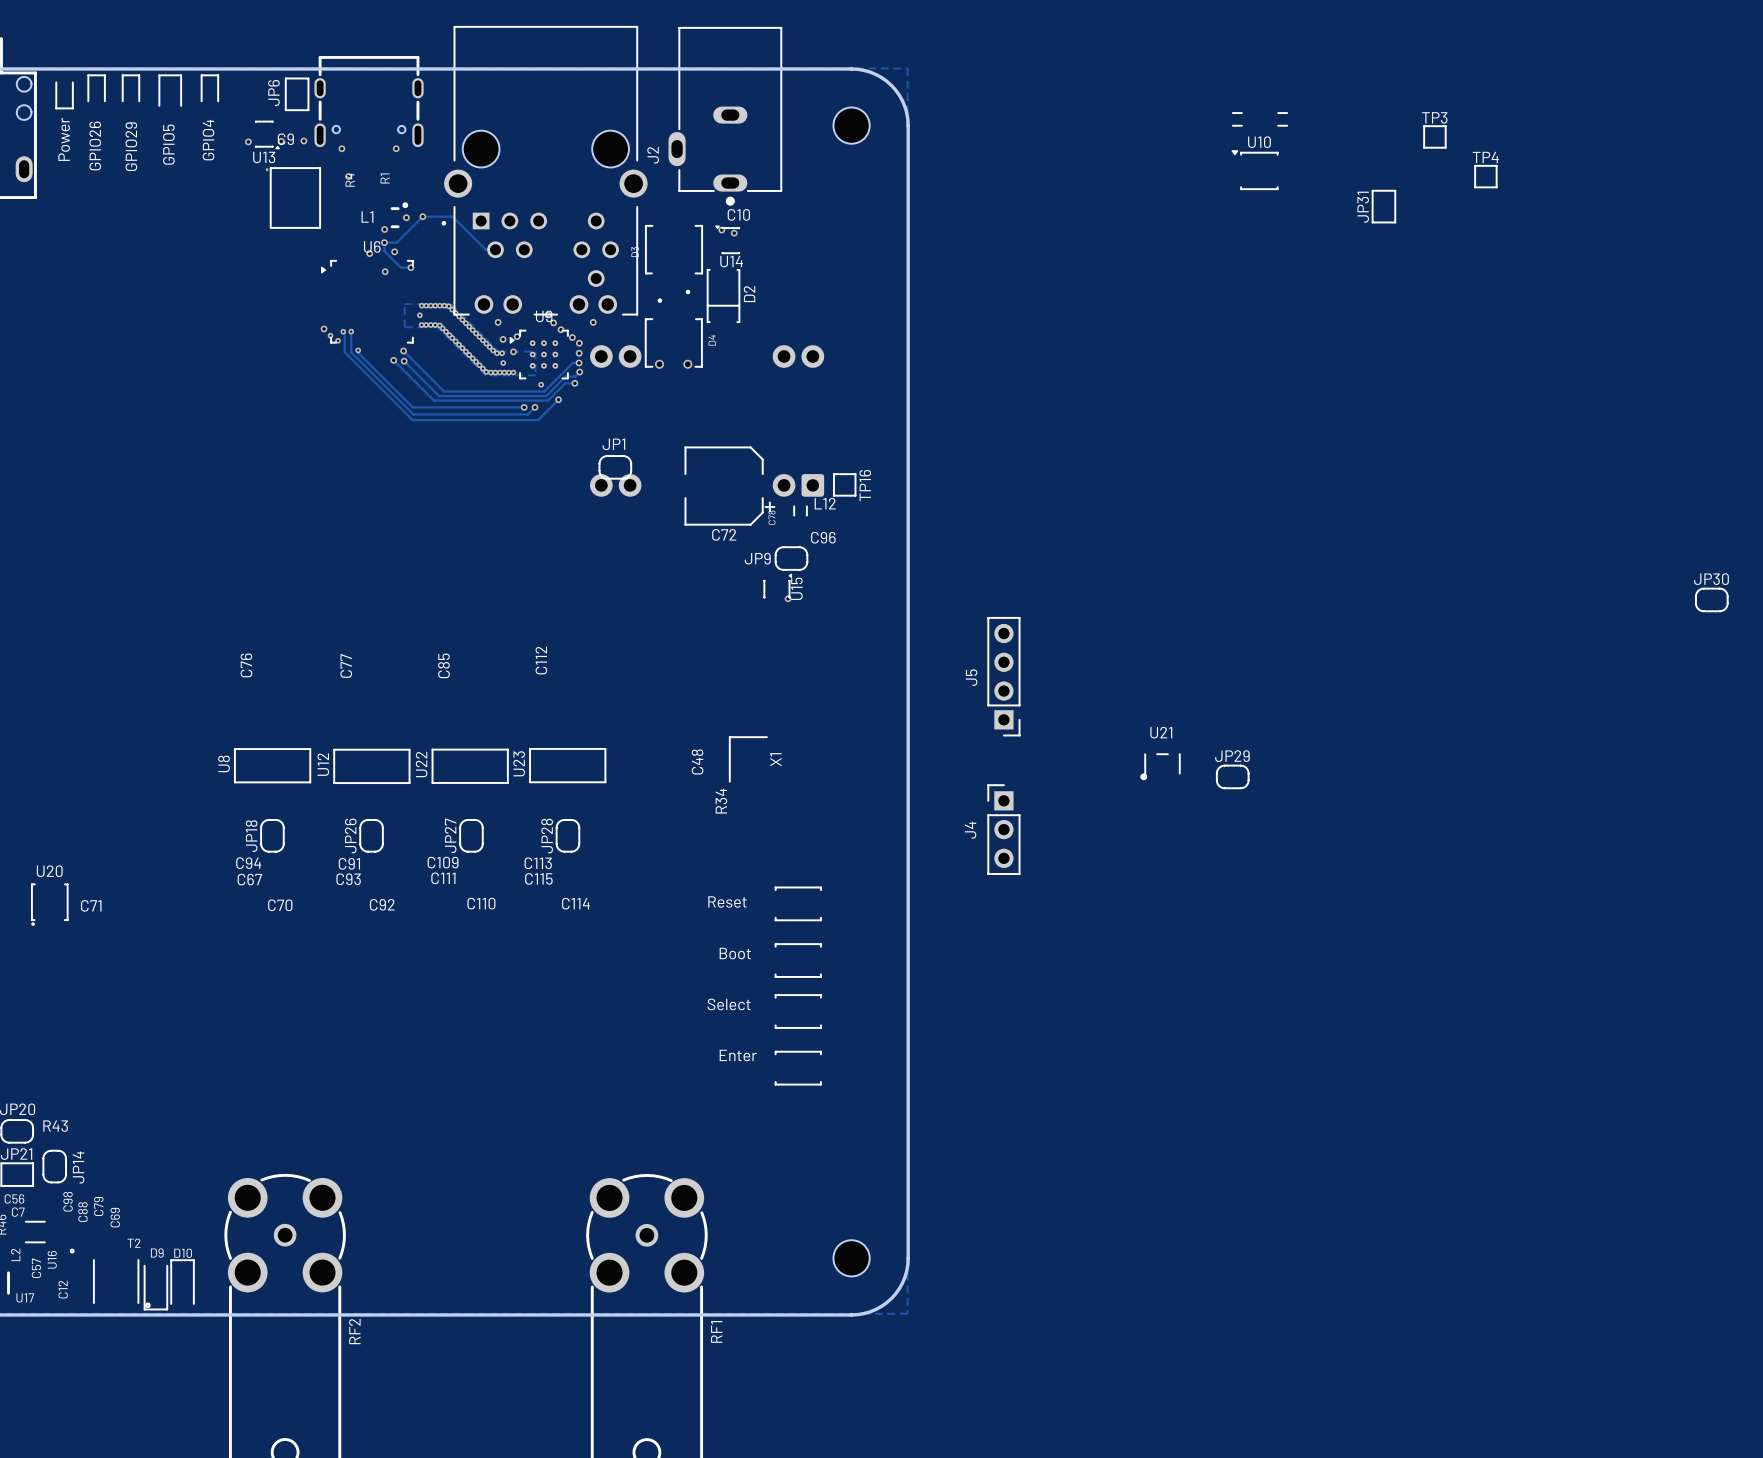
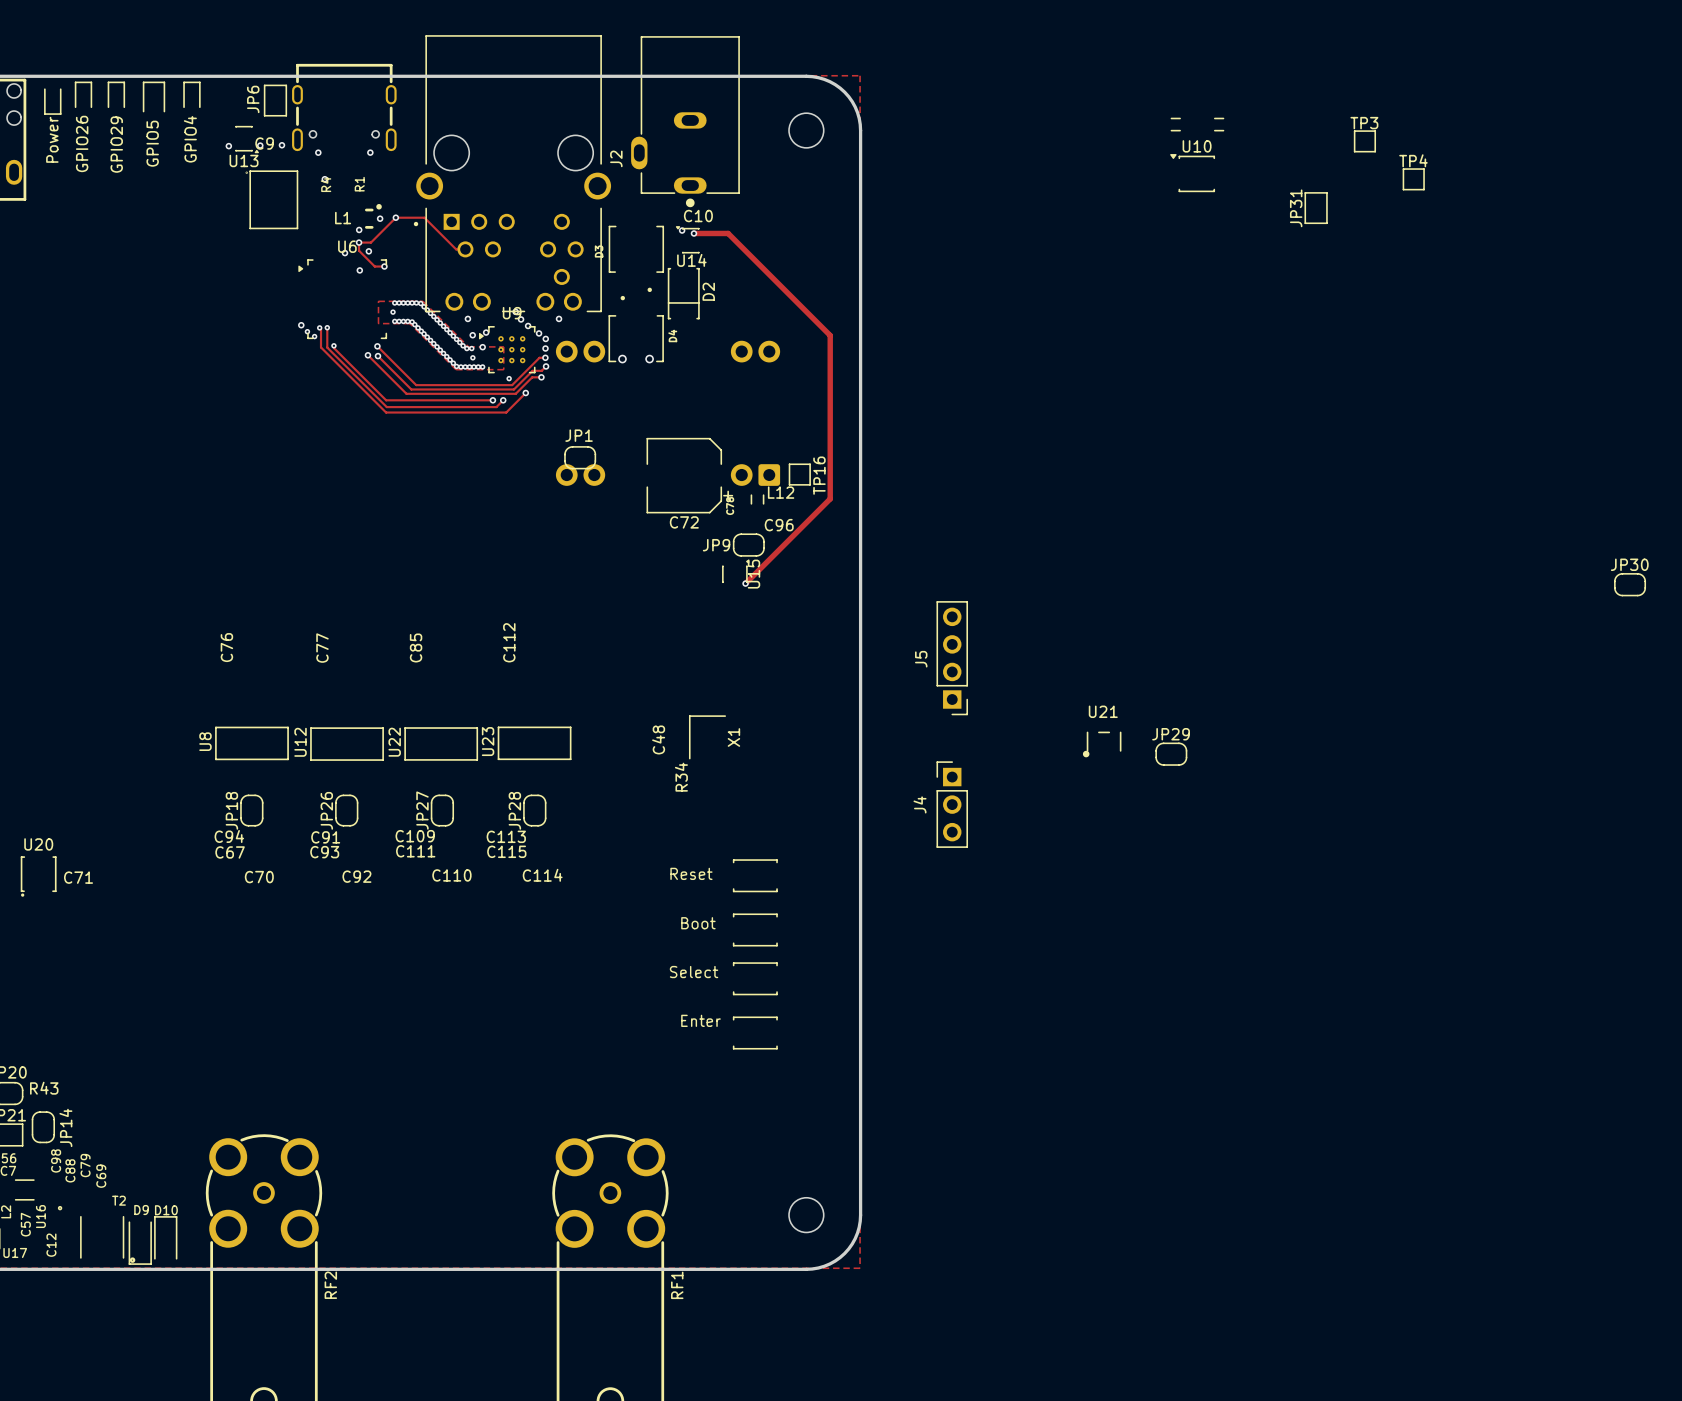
track: none -> (693, 233) (728, 233) (830, 335) (830, 498) (745, 583)

